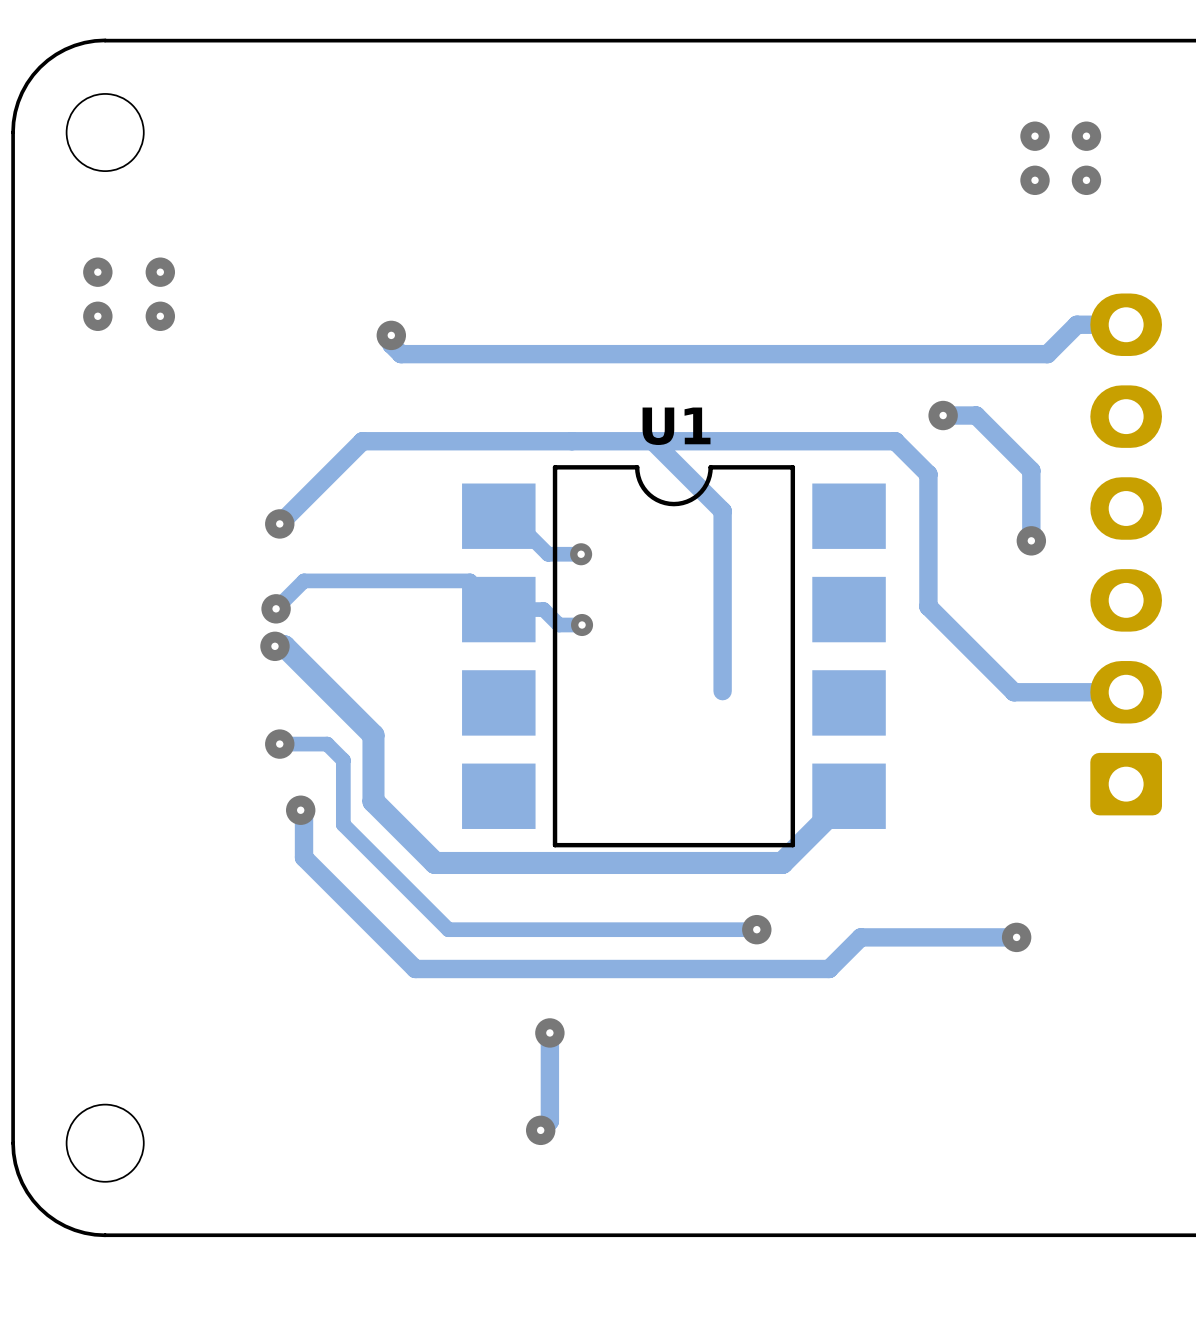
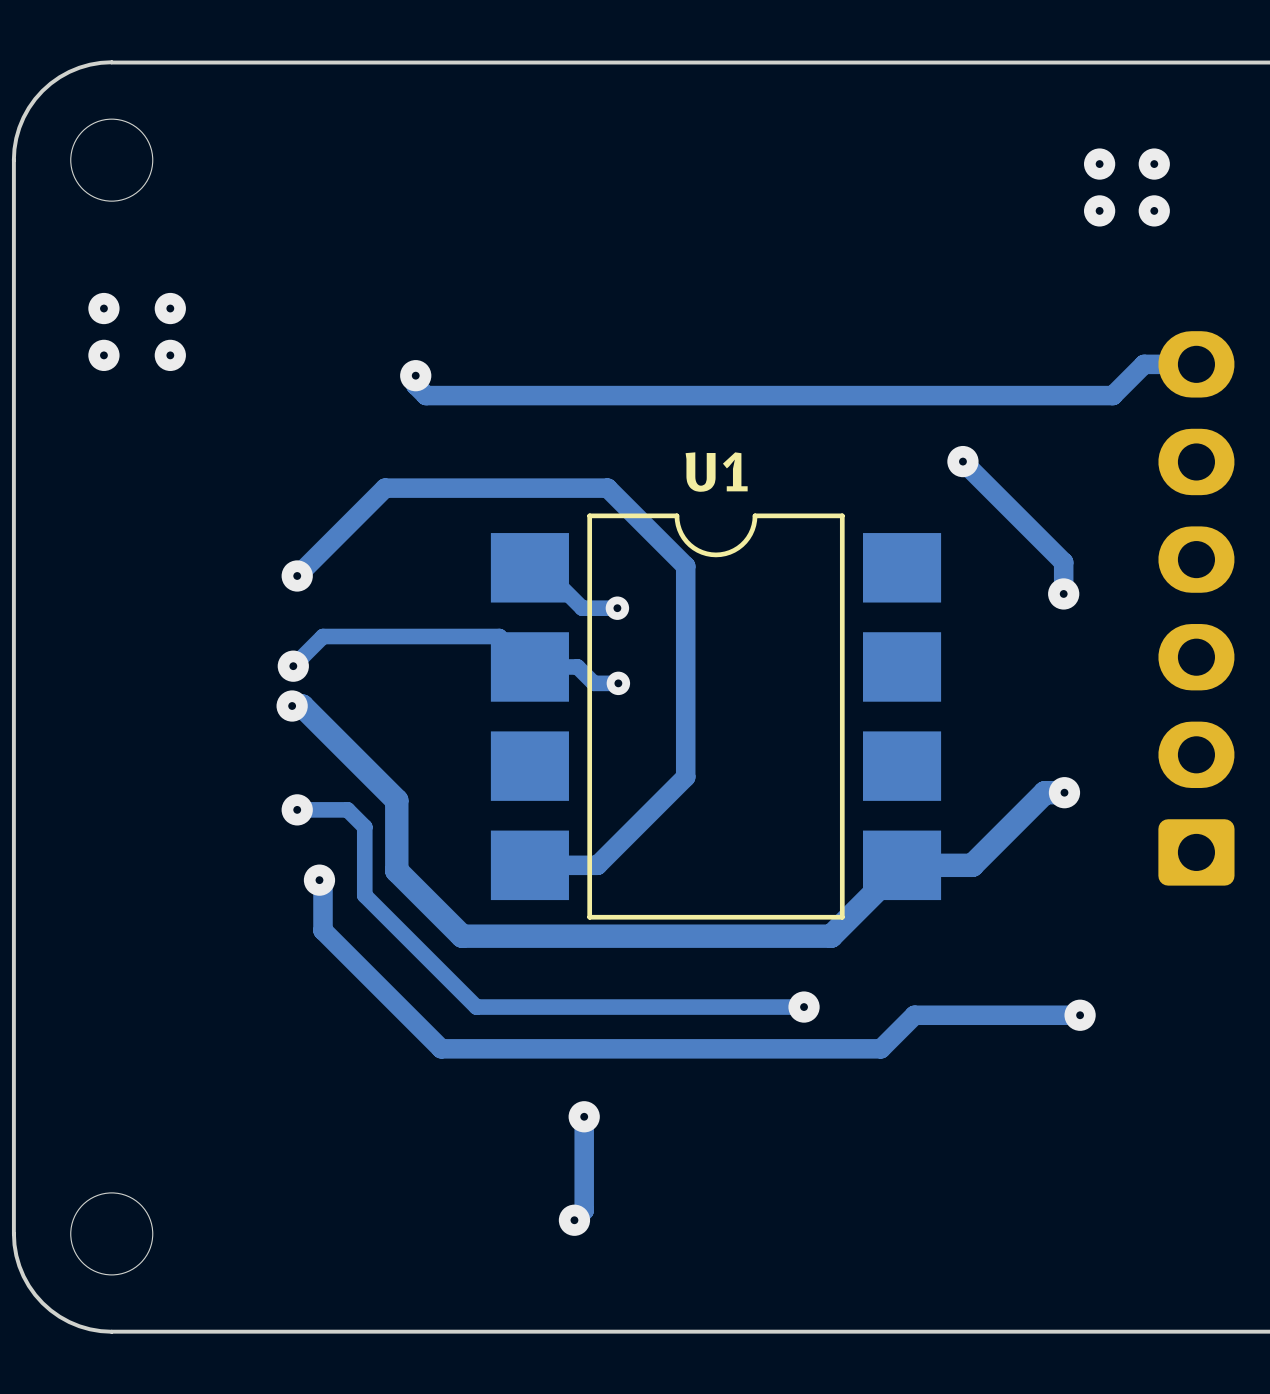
track: (943, 415) (976, 415) (1031, 470) (1031, 540) -> none
via position: (943, 415) -> (962, 461)
track: none -> (962, 461) (1063, 562) (1063, 593)
track: (571, 441) (895, 441) (928, 474) (928, 606) (1014, 692) (1126, 692) -> (607, 488) (685, 566) (685, 777) (597, 865) (529, 865)
track: (652, 441) (722, 511) (722, 691) -> none
via position: (1031, 540) -> (1063, 593)
track: none -> (1064, 792) (1044, 792) (972, 865) (902, 865)
via: none -> (1064, 792)

